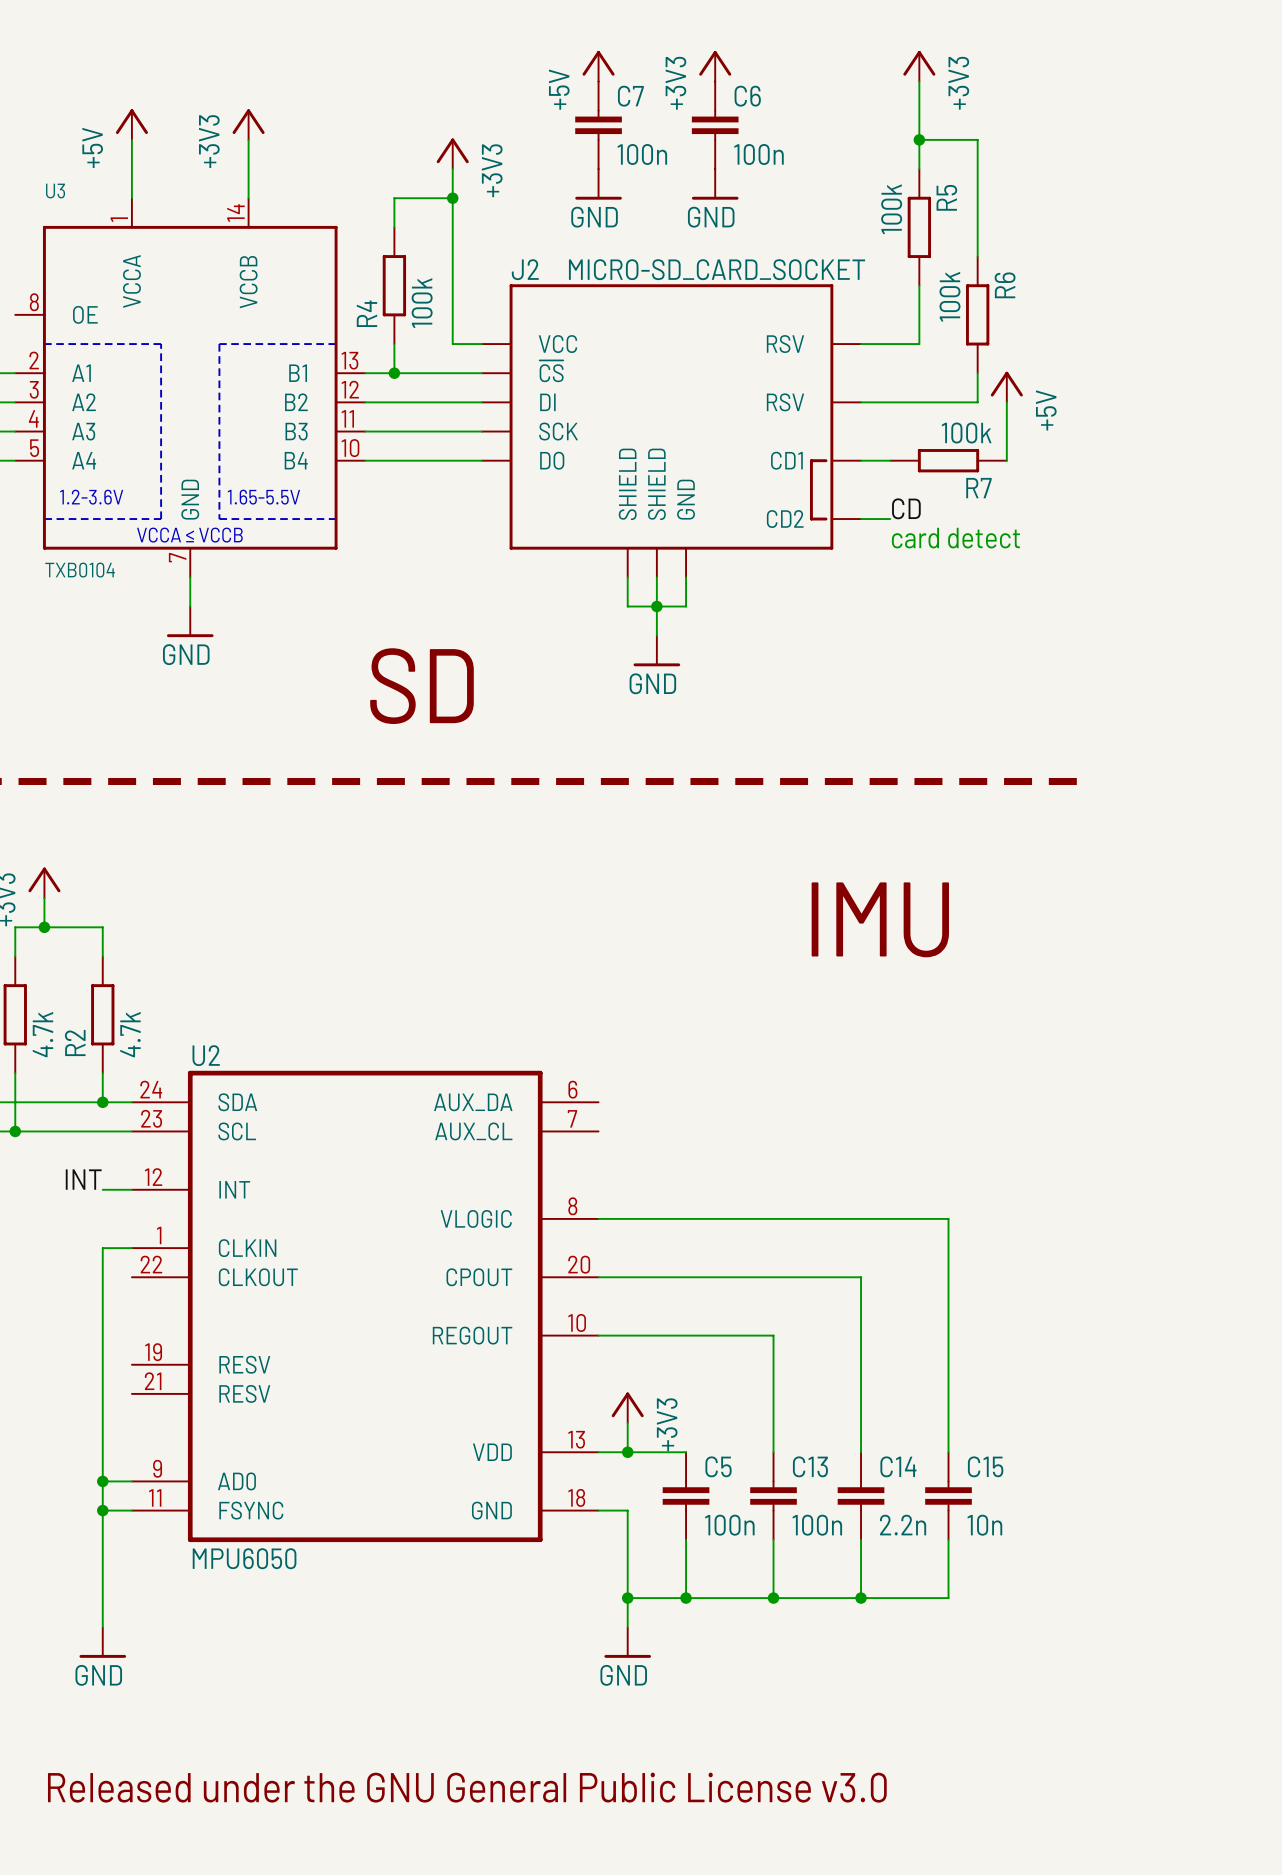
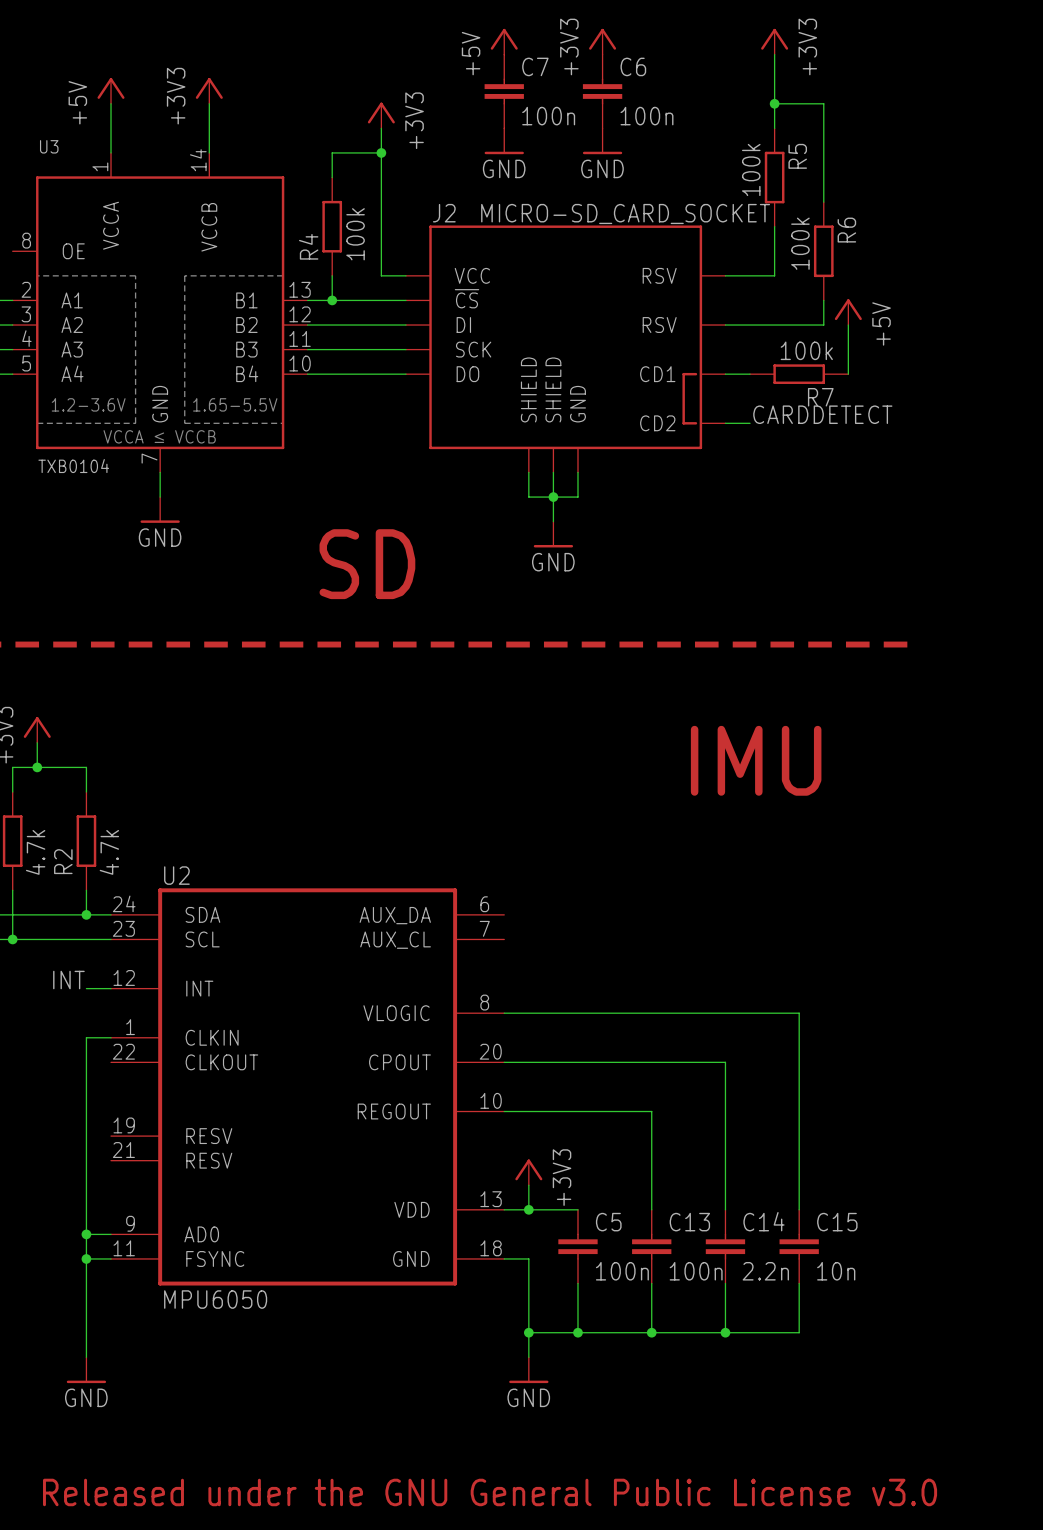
label: CD (906, 508) -> CARDDETECT (822, 414)
text: card detect (955, 538) -> none

